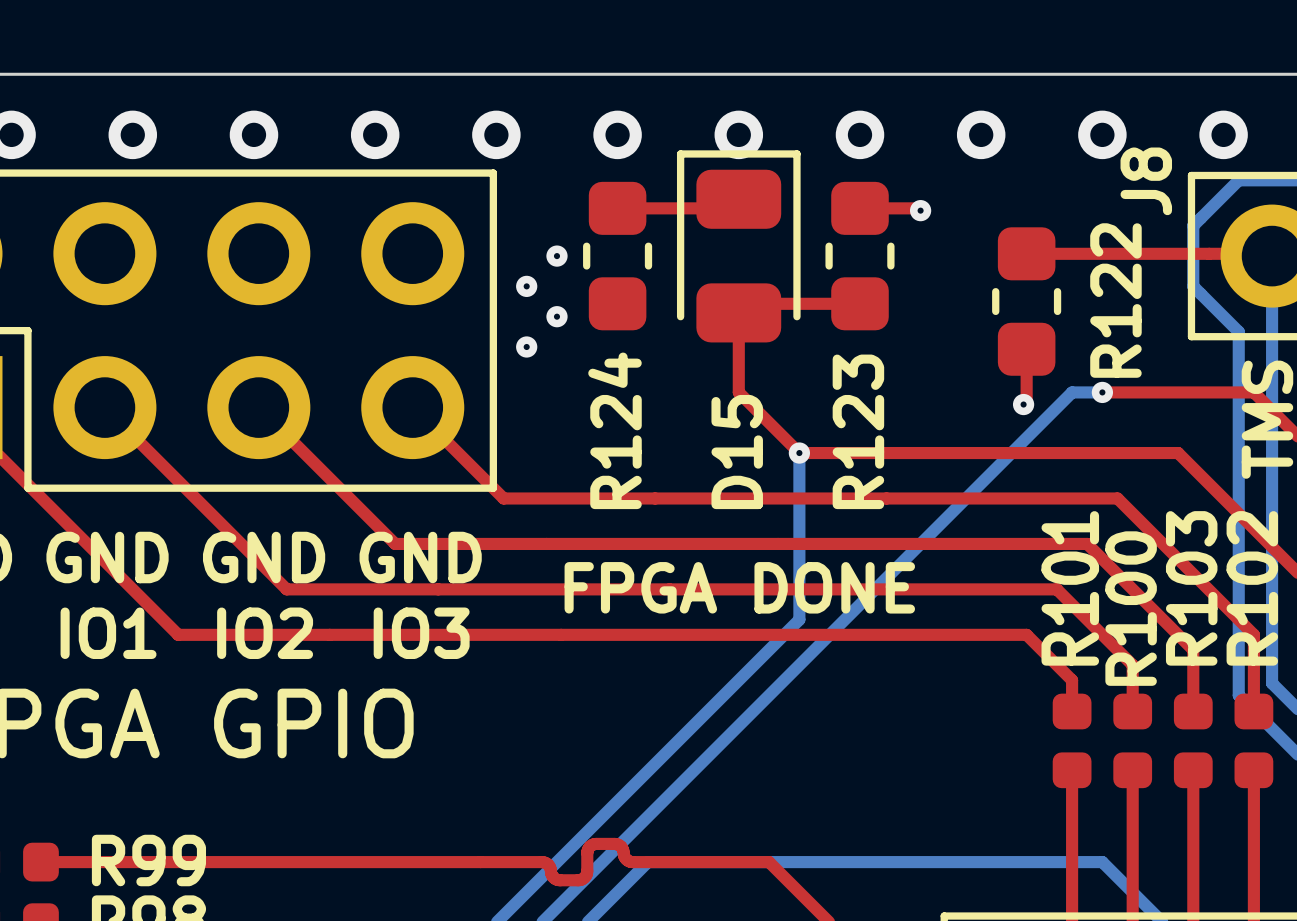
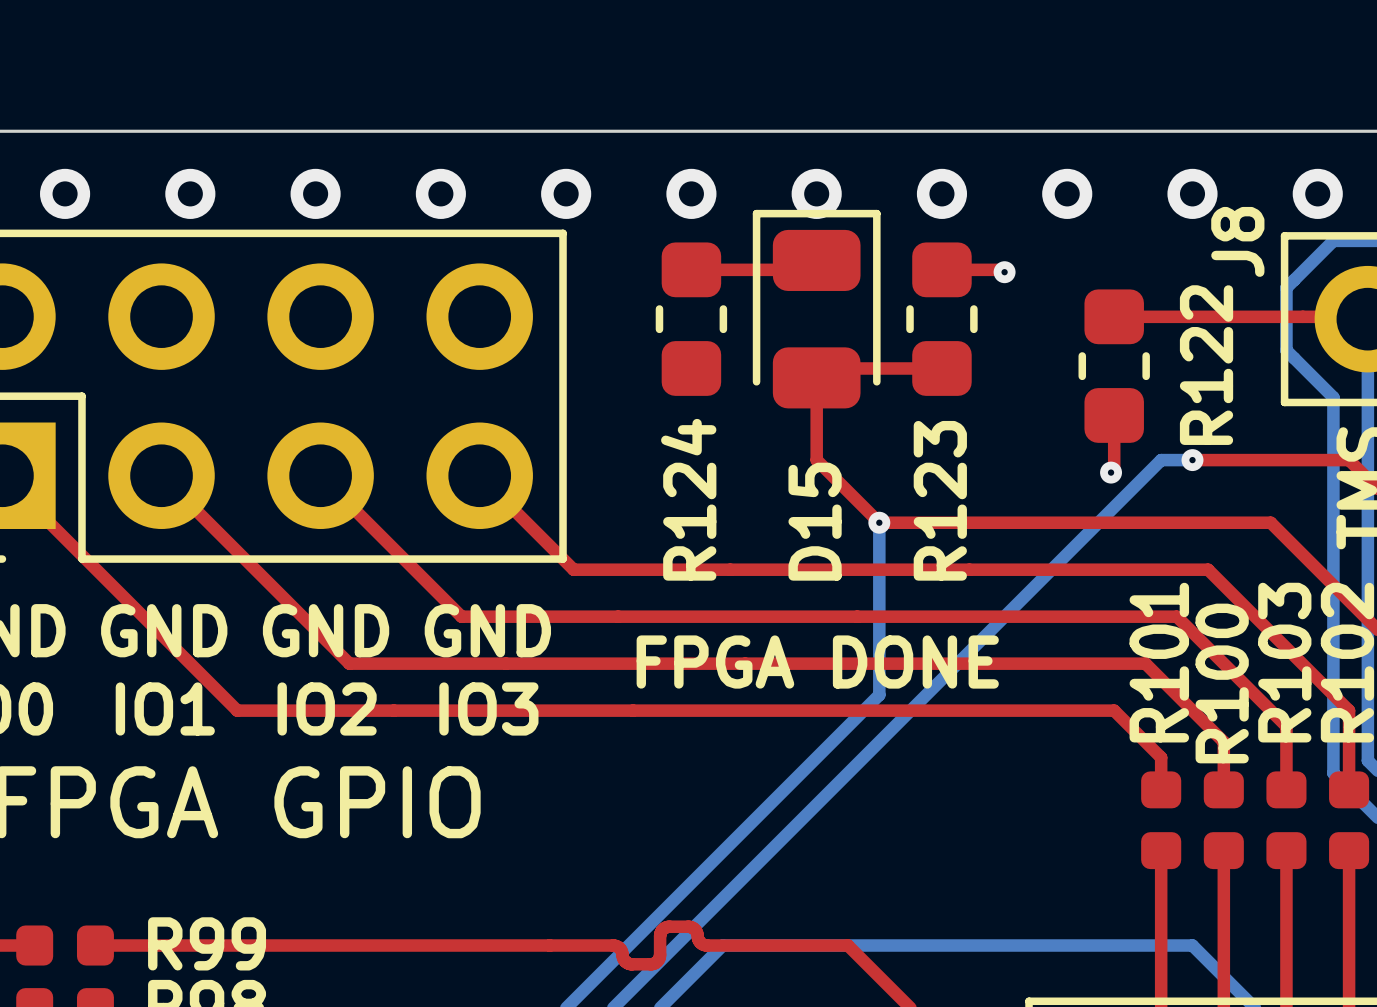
via: (556, 256) -> none
via: (526, 286) -> none
via: (556, 316) -> none
via: (526, 346) -> none

